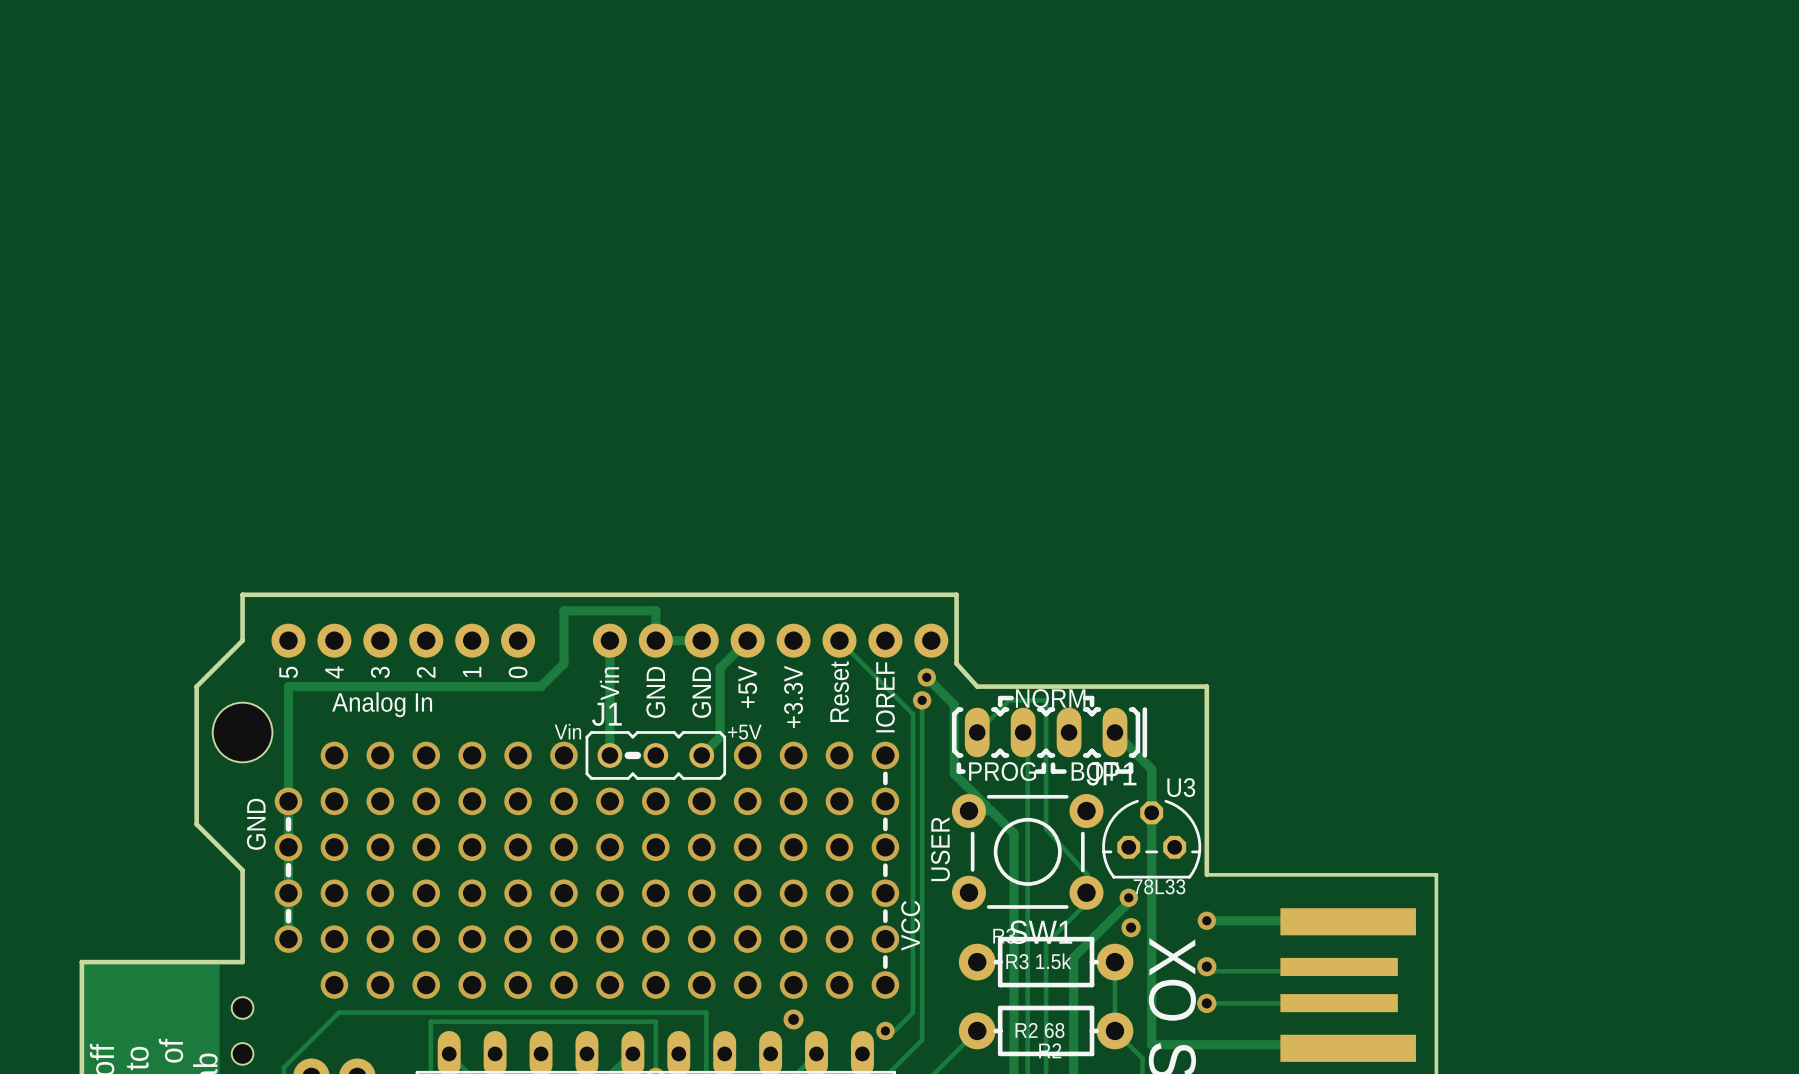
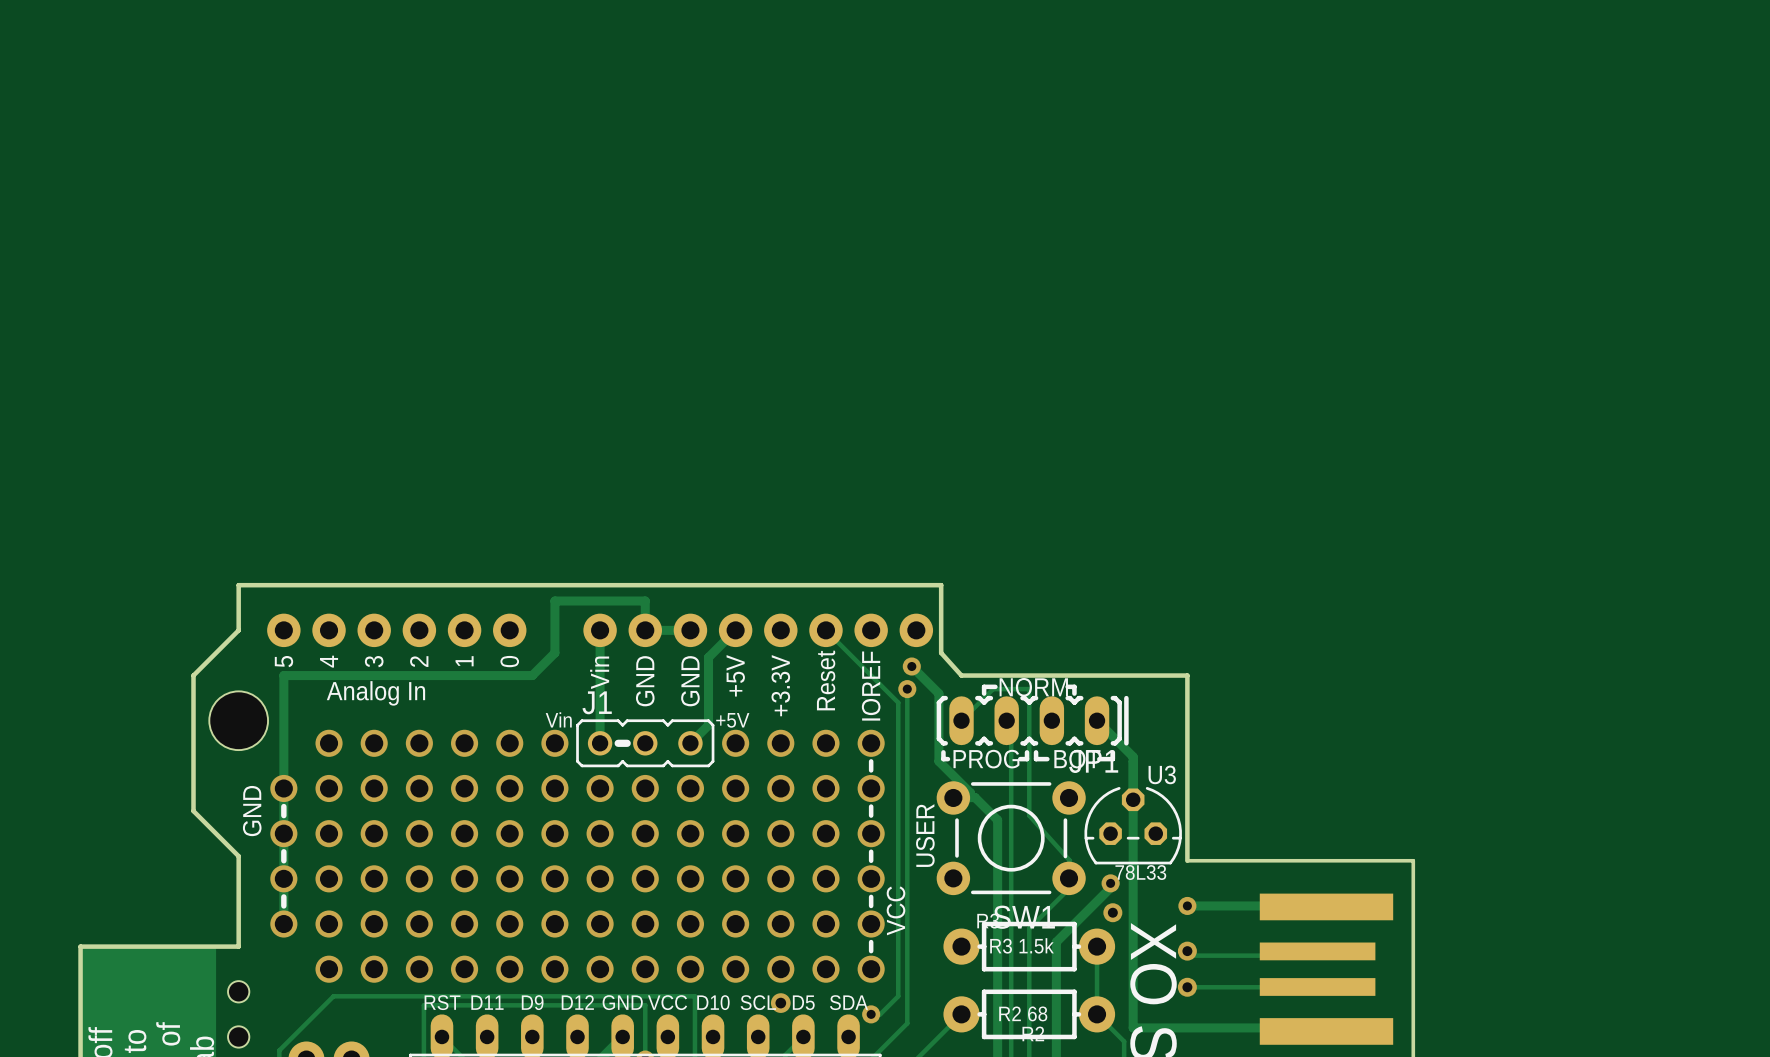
text: none -> D12 (577, 1002)
text: none -> RST (442, 1002)
text: none -> D11 (487, 1002)
text: none -> D9 (532, 1002)
text: none -> GND (622, 1002)
text: none -> VCC (667, 1002)
text: none -> D10 (713, 1002)
text: none -> SCL (758, 1002)
text: none -> D5 (803, 1002)
text: none -> SDA (848, 1002)

